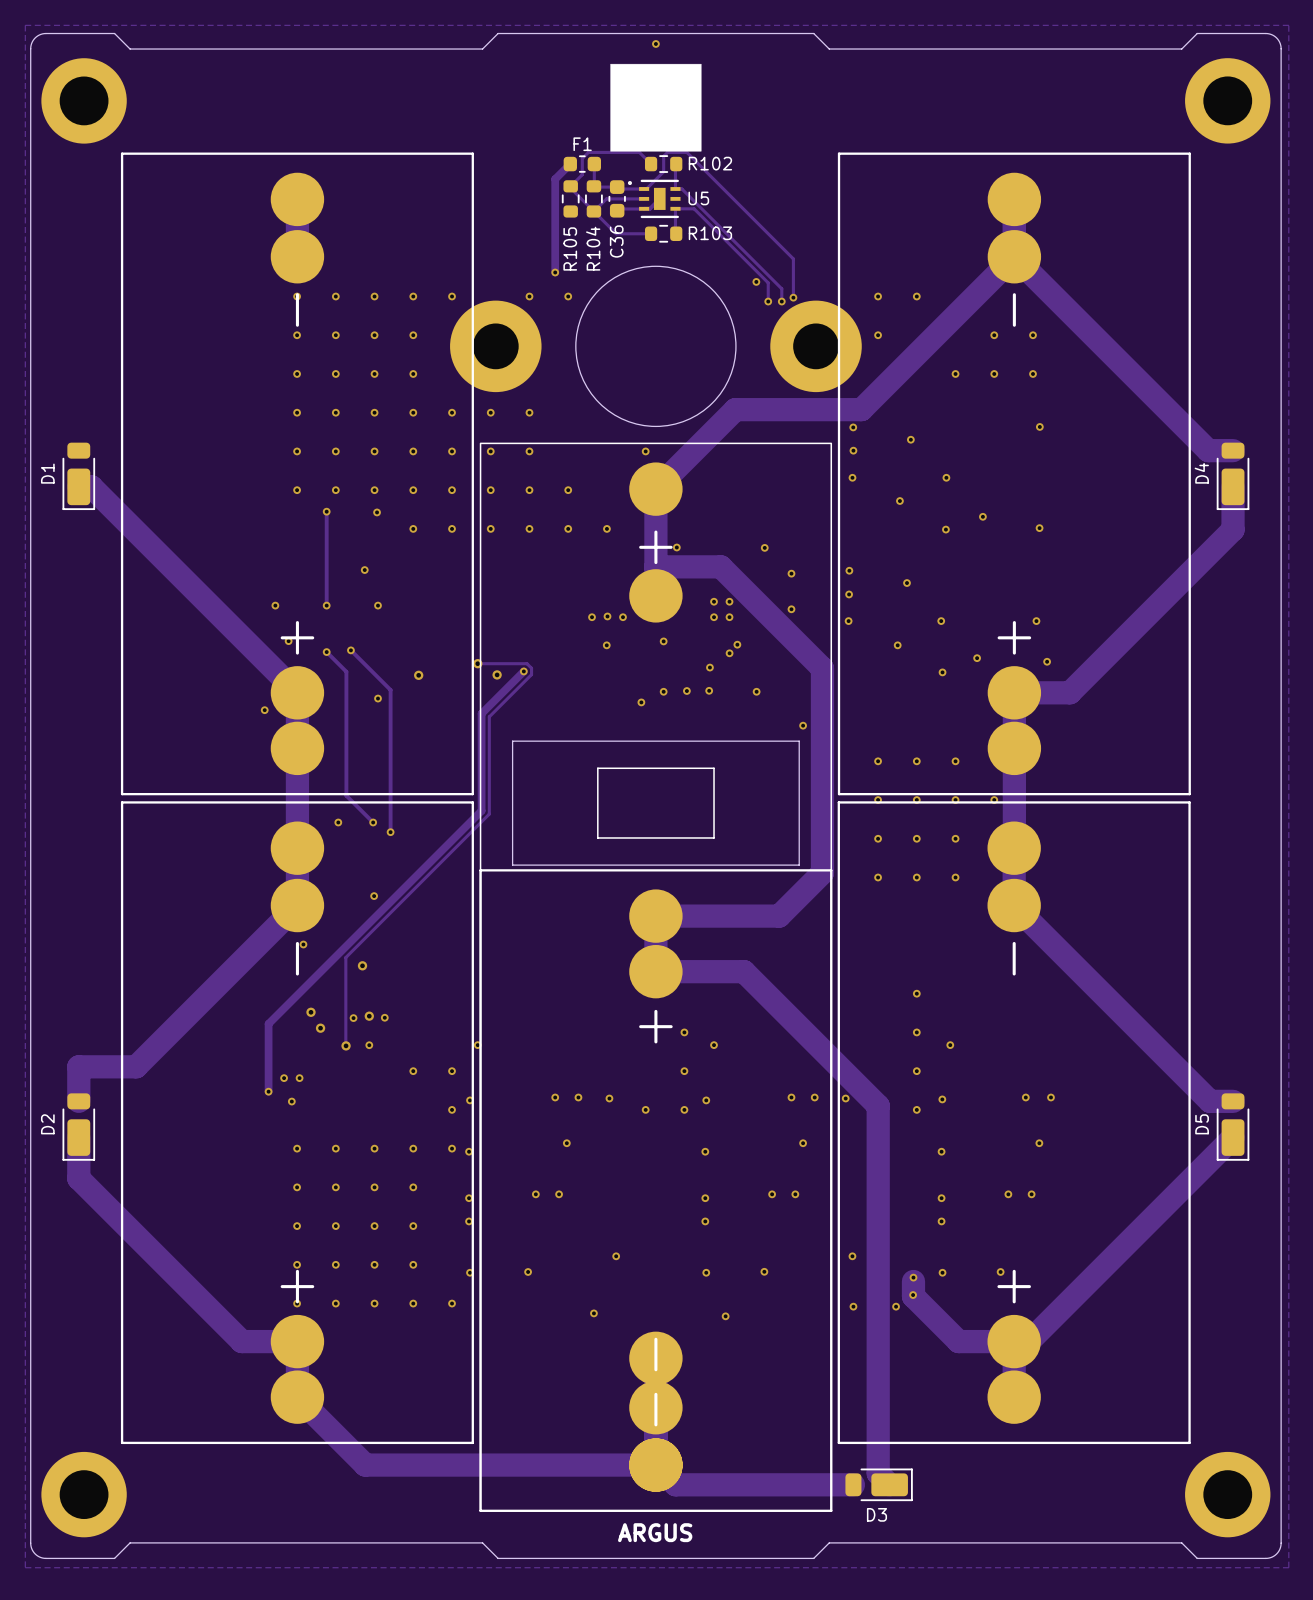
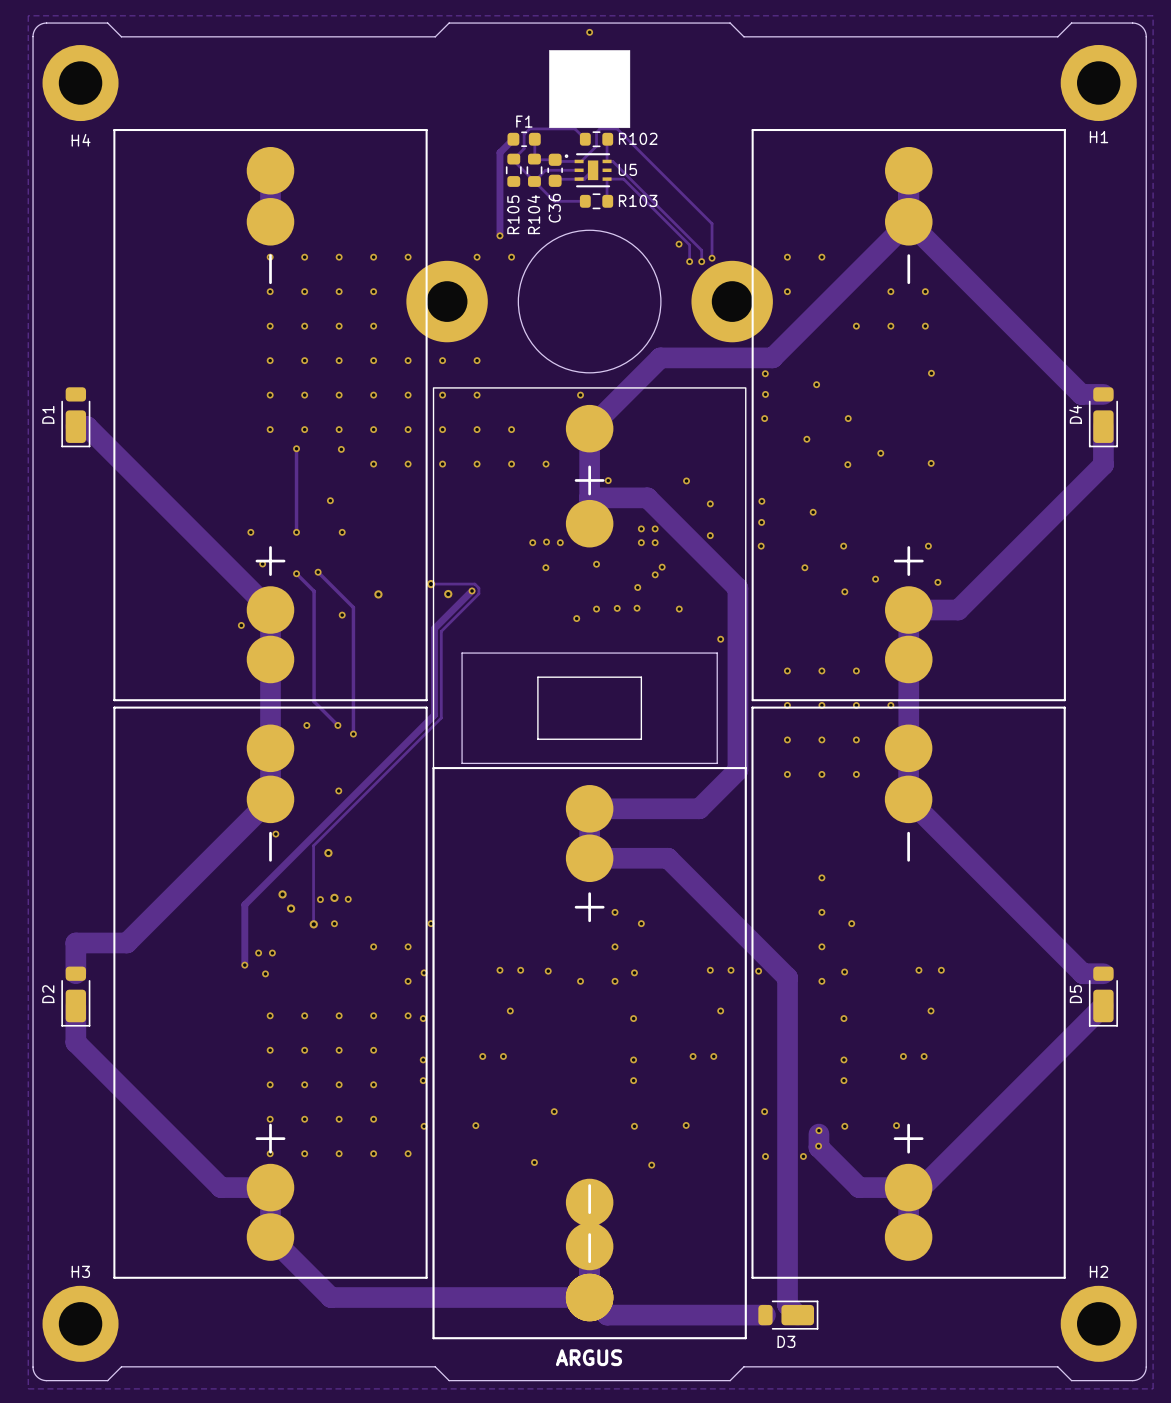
H1 name: none -> H1 (1098, 137)
H4 name: none -> H4 (81, 140)
H3 name: none -> H3 (80, 1271)
H2 name: none -> H2 (1098, 1271)

